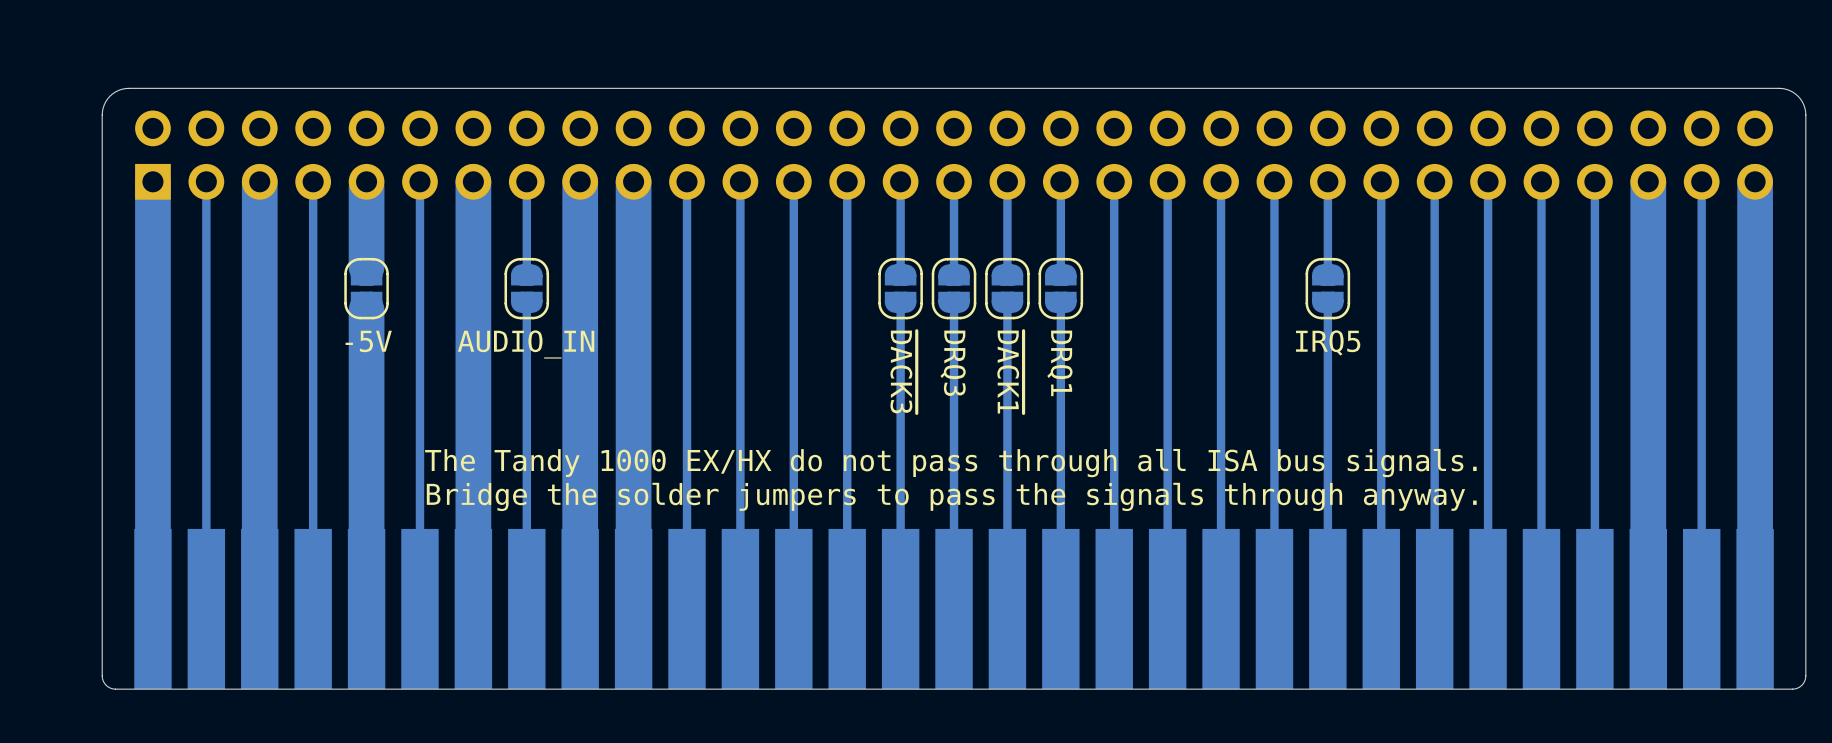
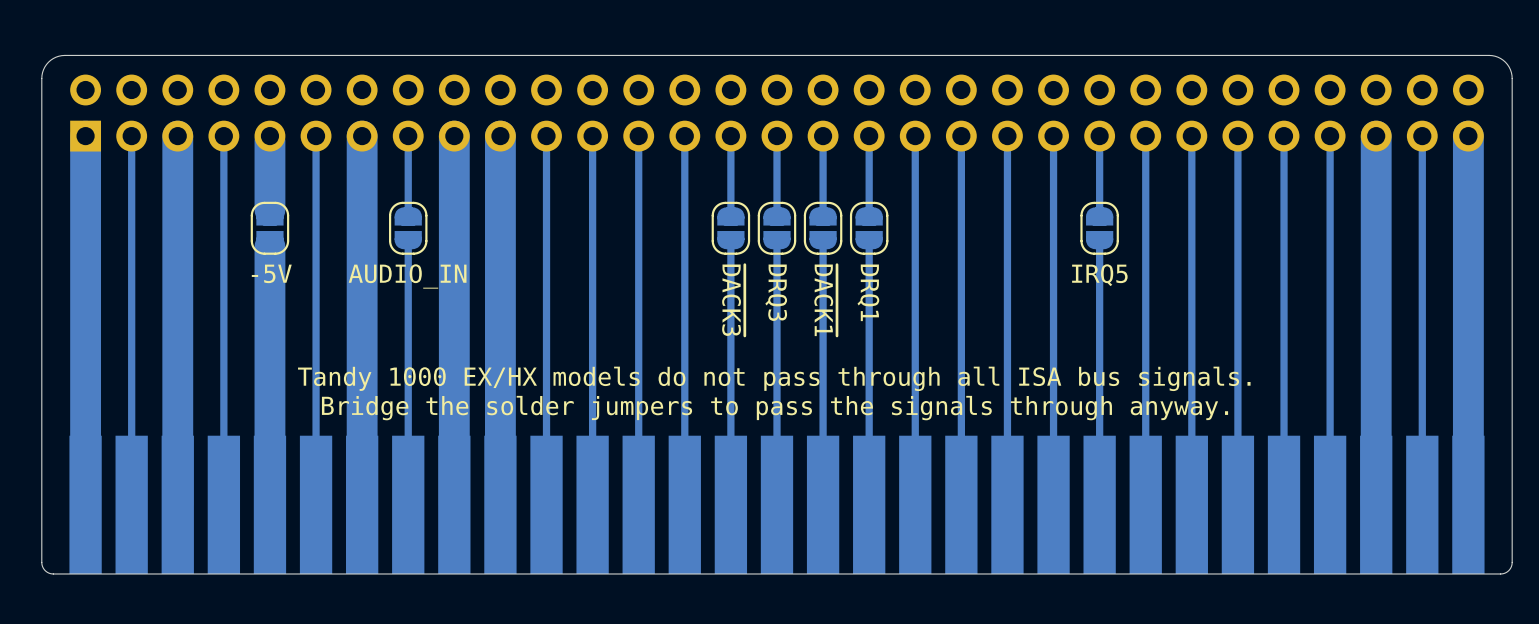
text: The Tandy 1000 EX/HX do not pass through all ISA bus signals. (950, 463) -> Tandy 1000 EX/HX models do not pass through all ISA bus signals. (774, 378)

